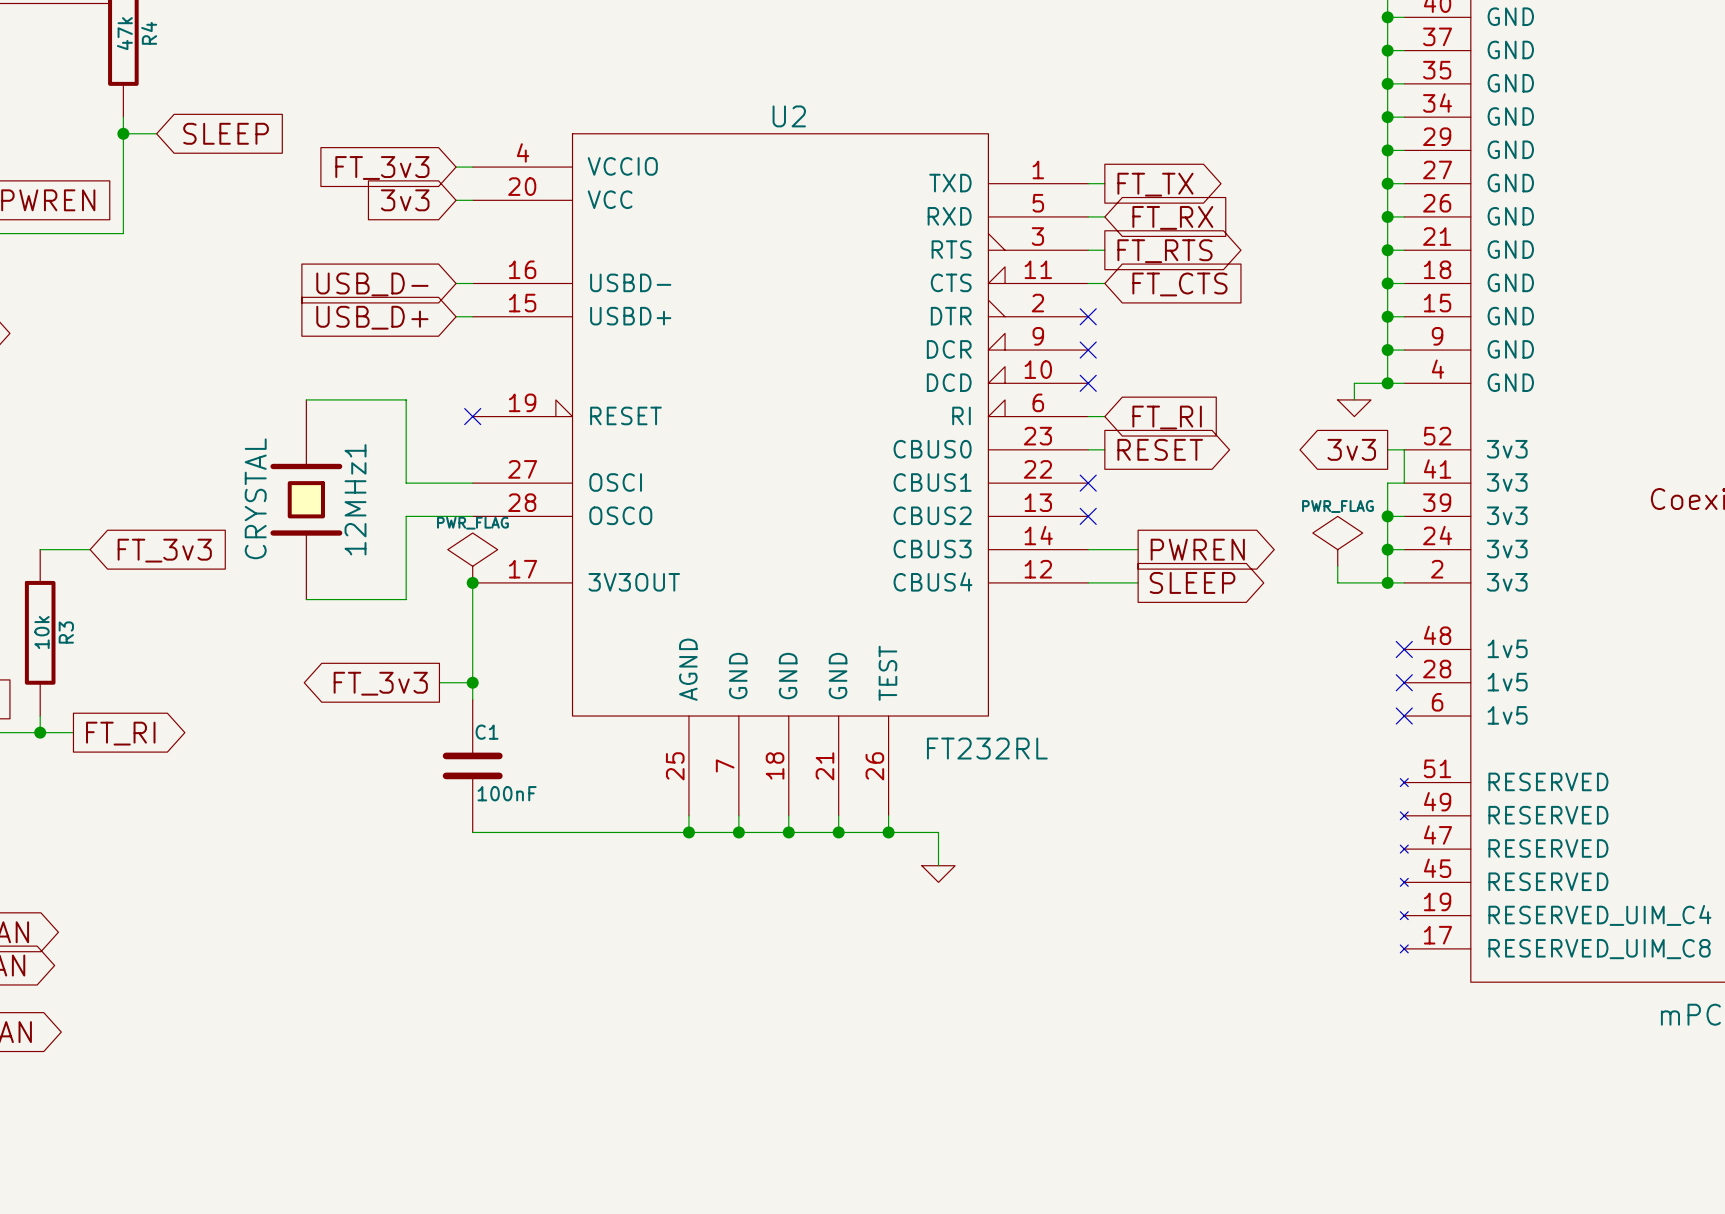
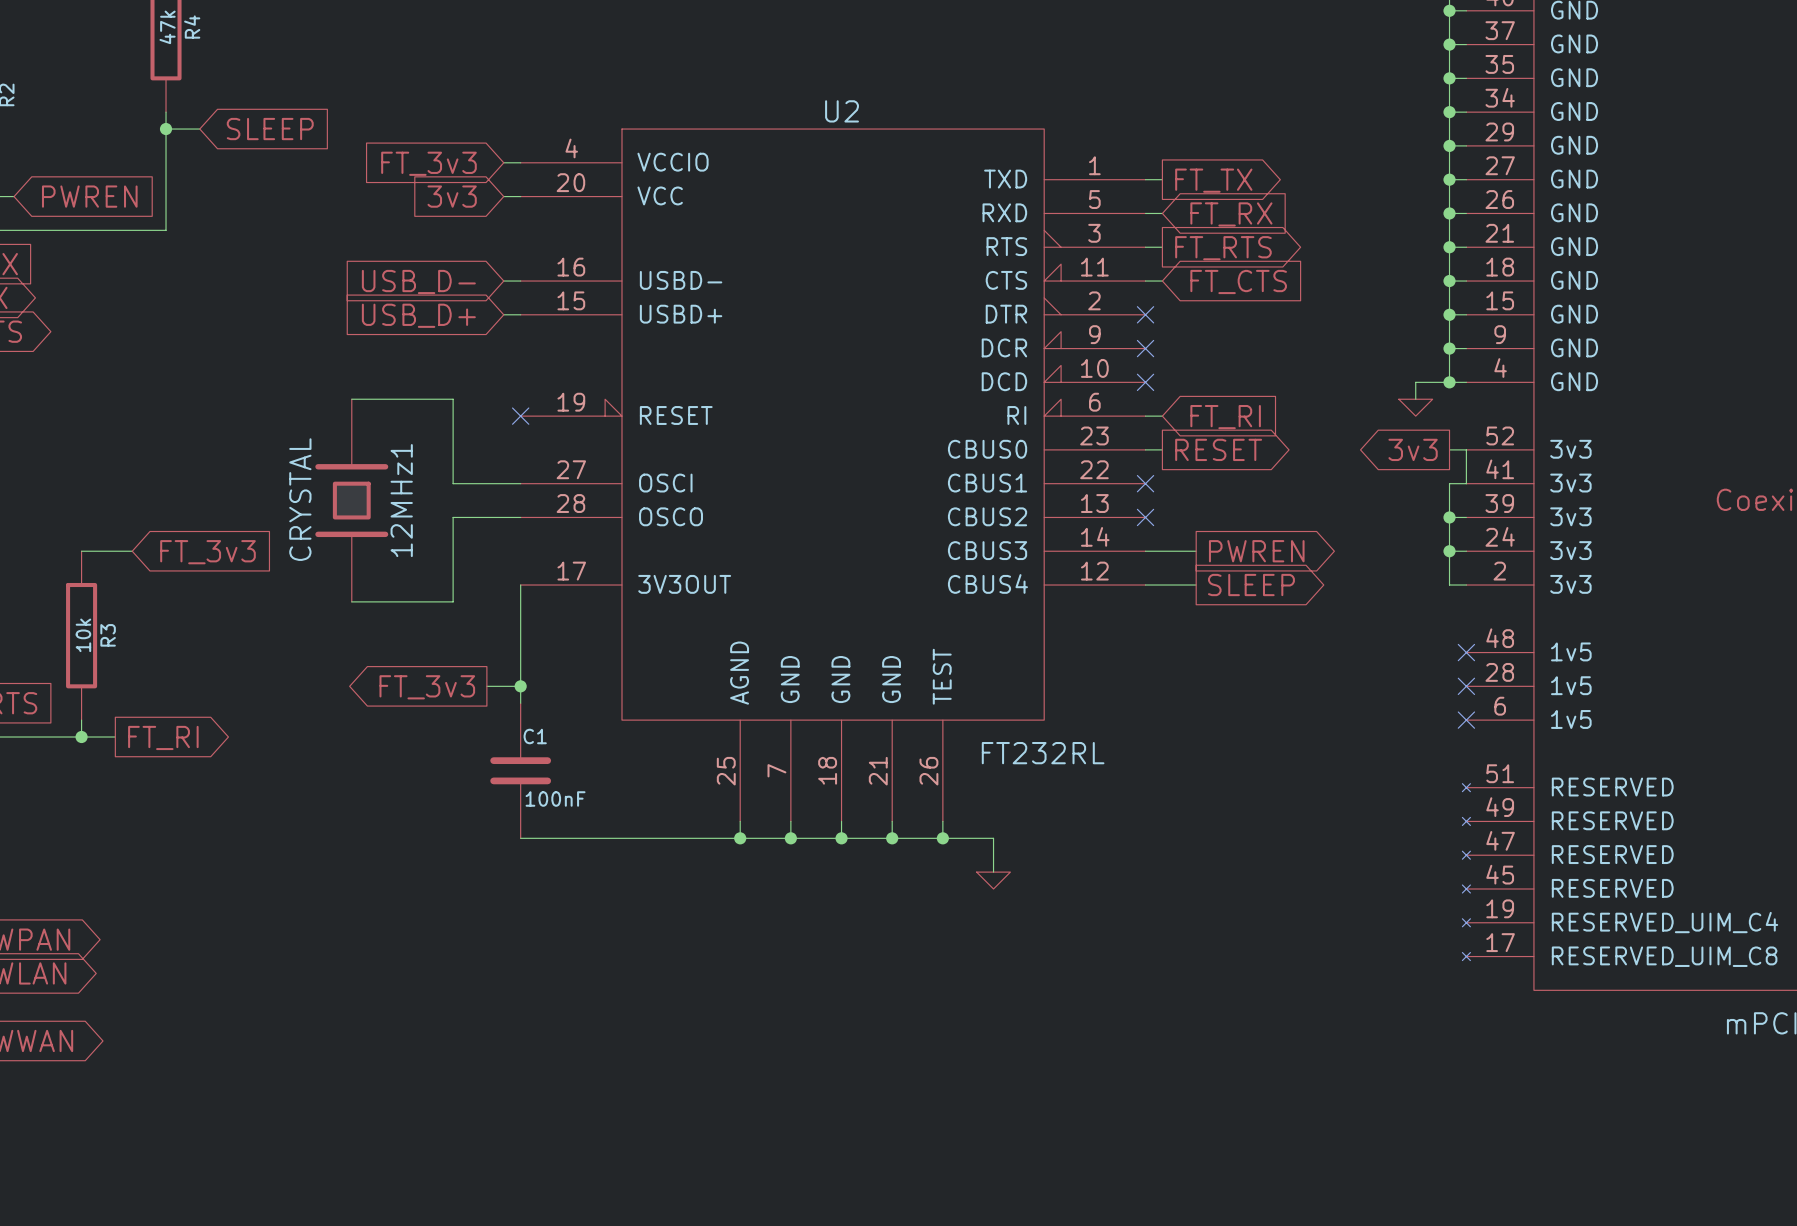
power symbol: PWR_FLAG (1337, 541) -> none
power symbol: PWR_FLAG (472, 557) -> none
wire: (1337, 566) (1337, 582) (1387, 582) -> none
junction: (472, 582) -> none
junction: (1387, 582) -> none

